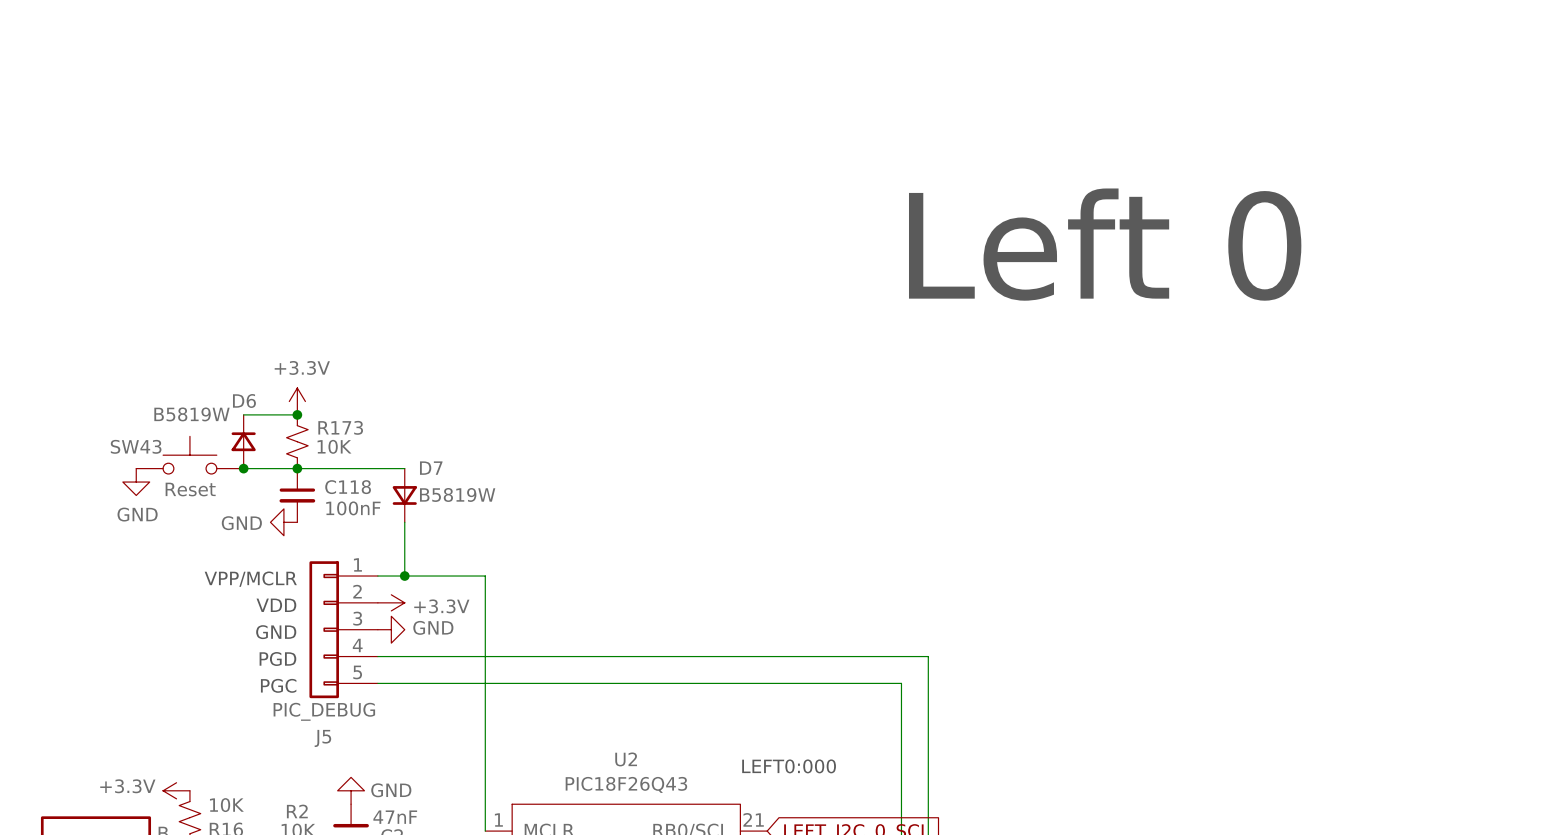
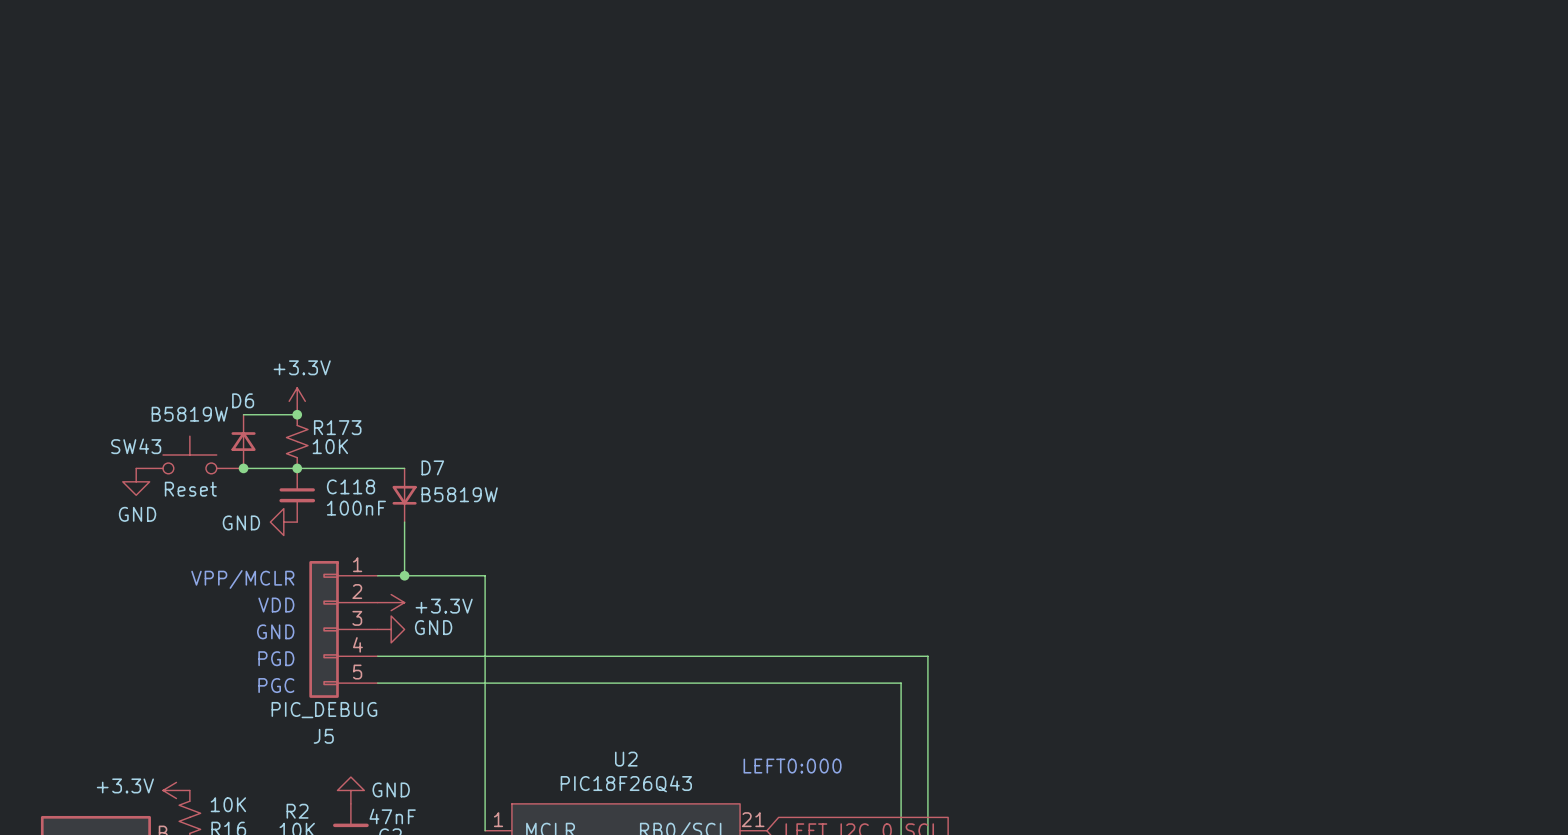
text: Left 0 (1105, 244) -> none

